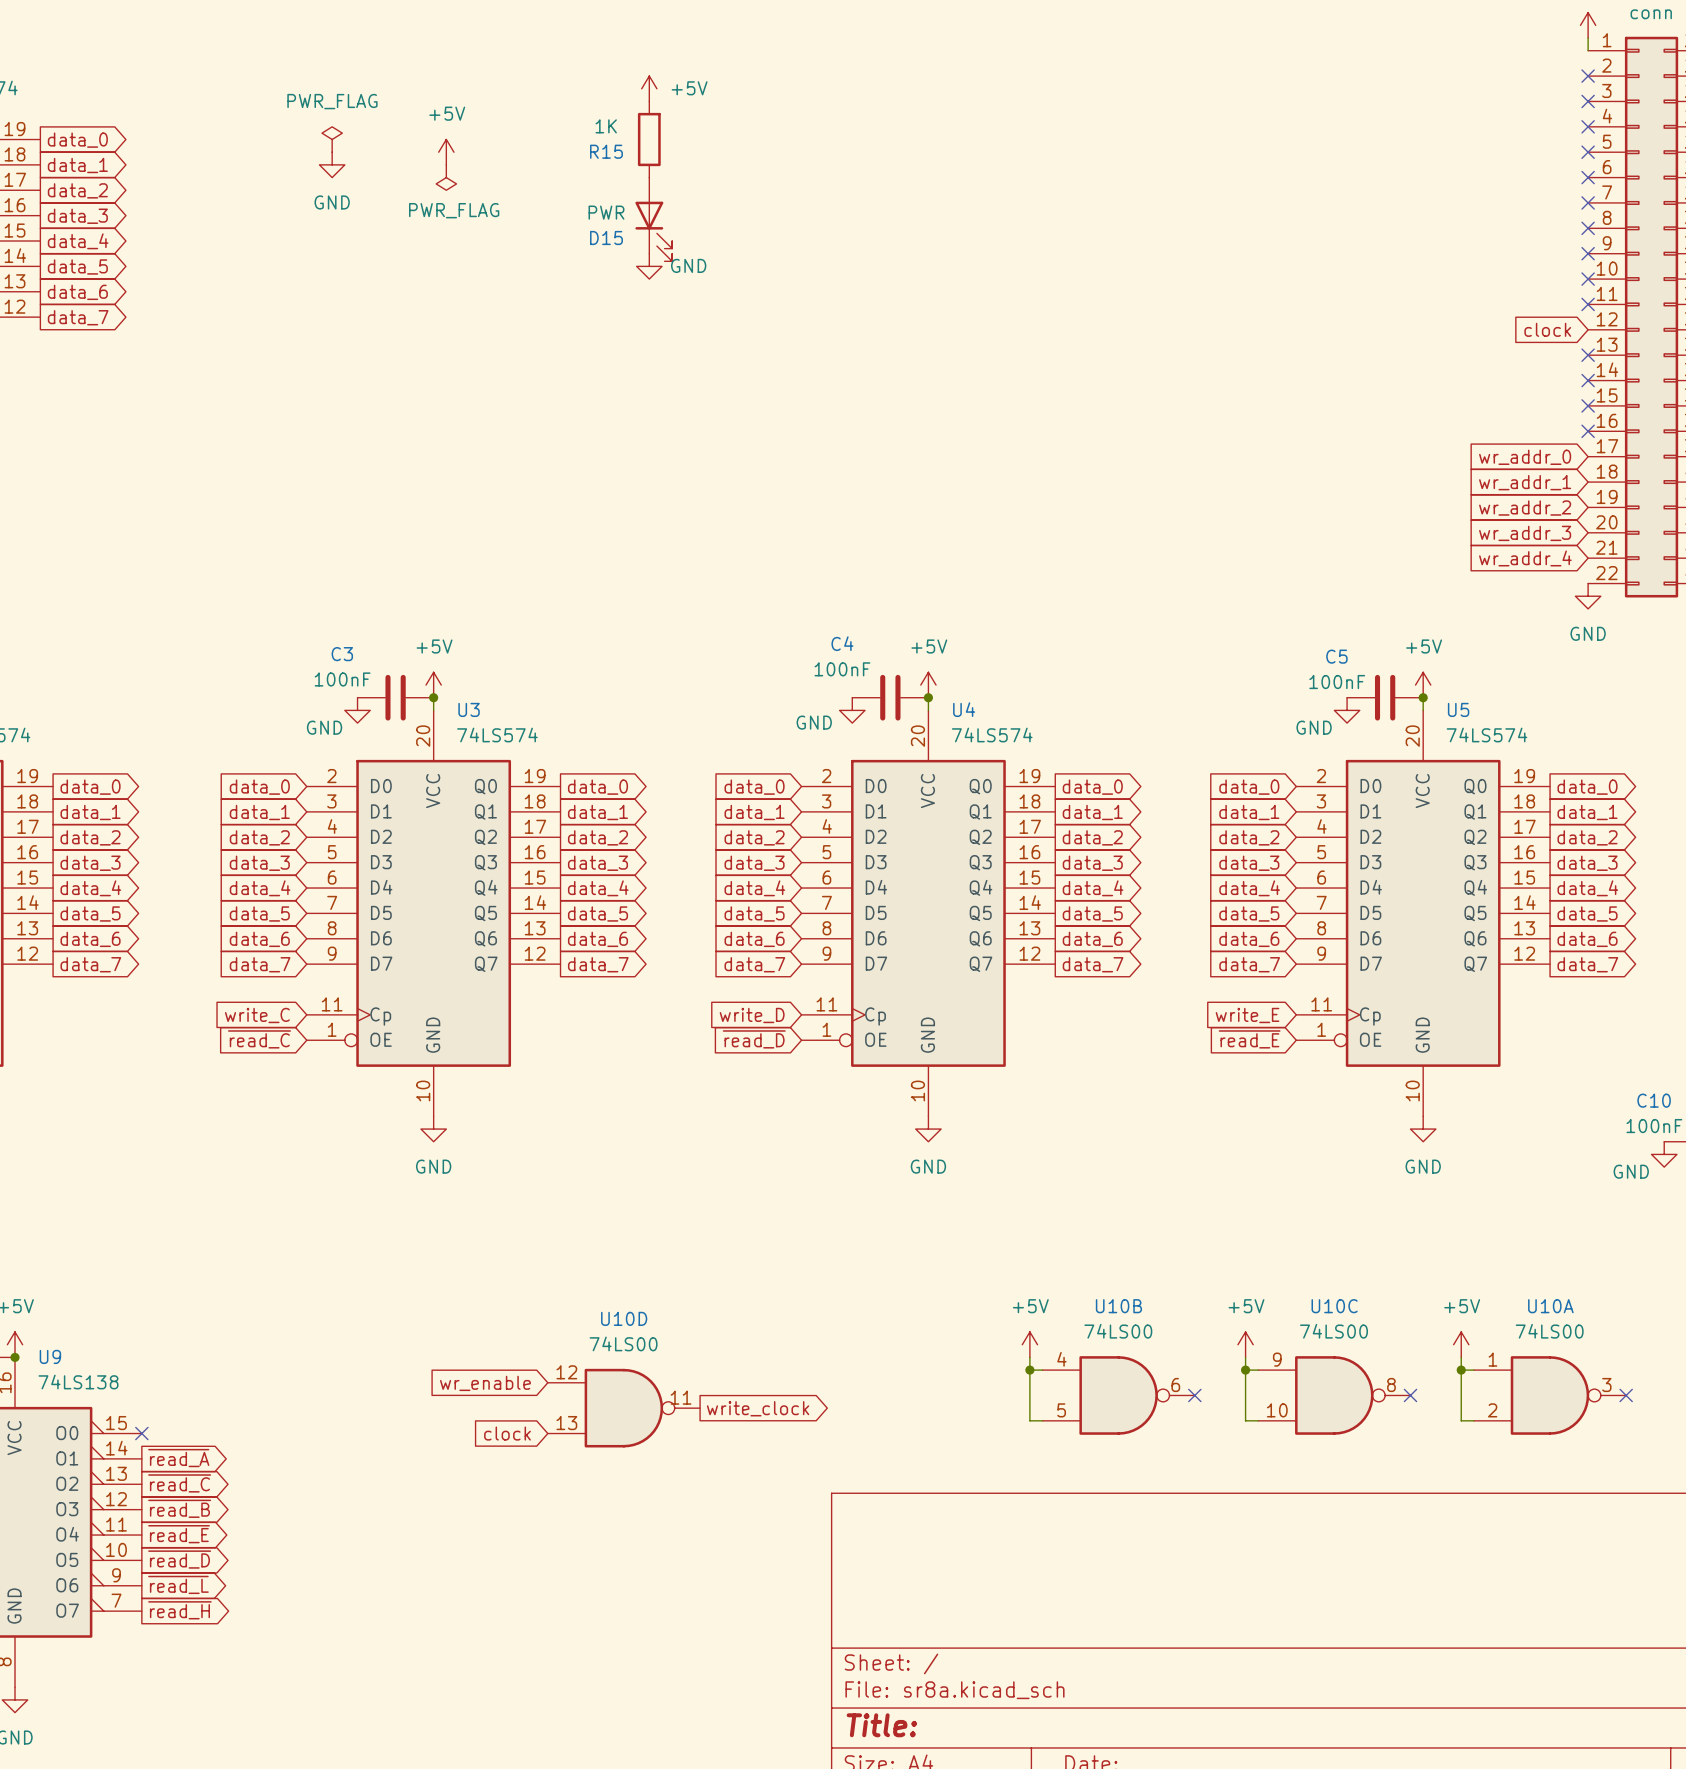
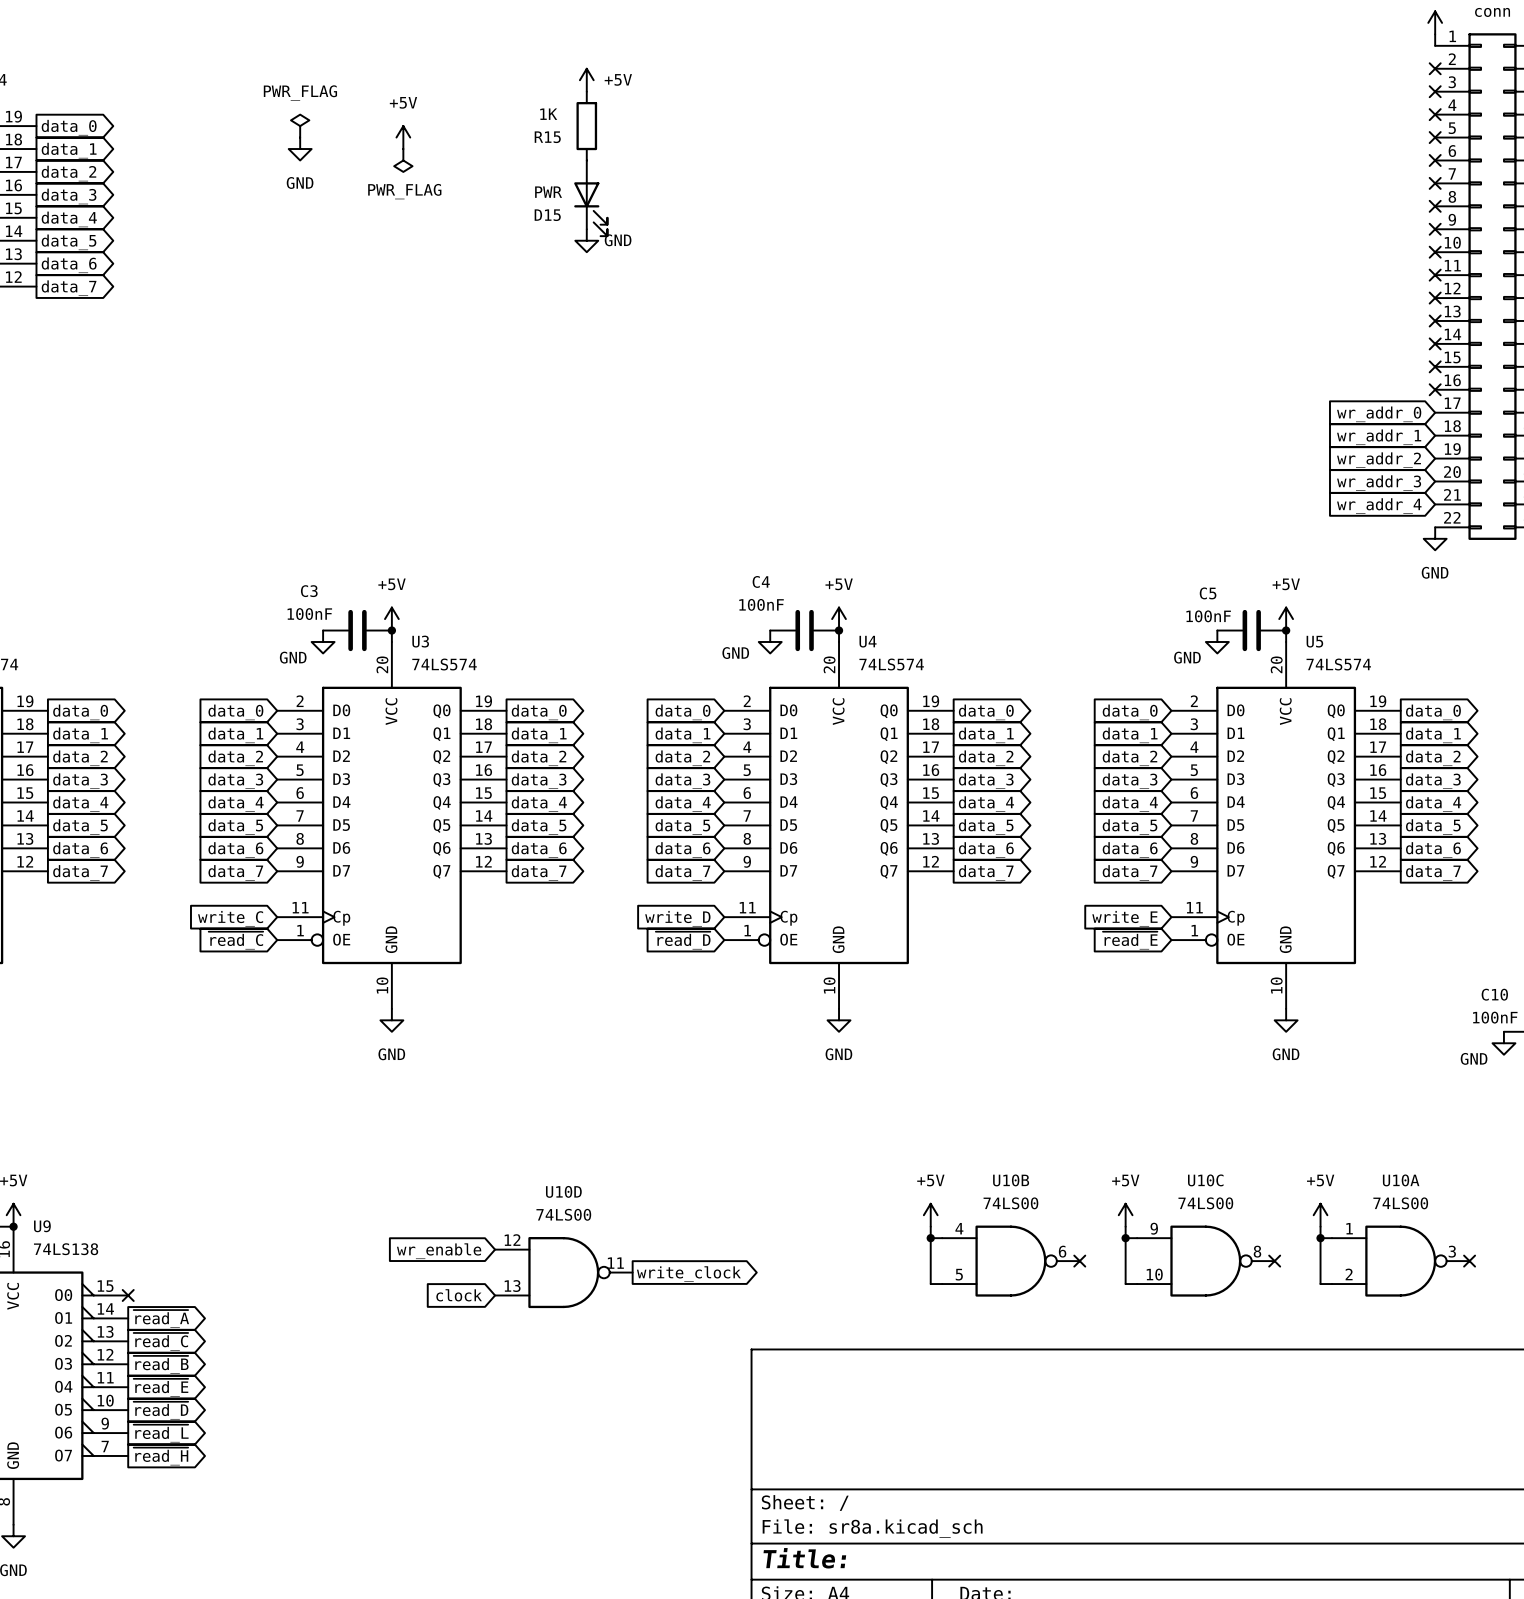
global label: clock (1547, 329) -> none
no-connect mark: none -> (1435, 298)

